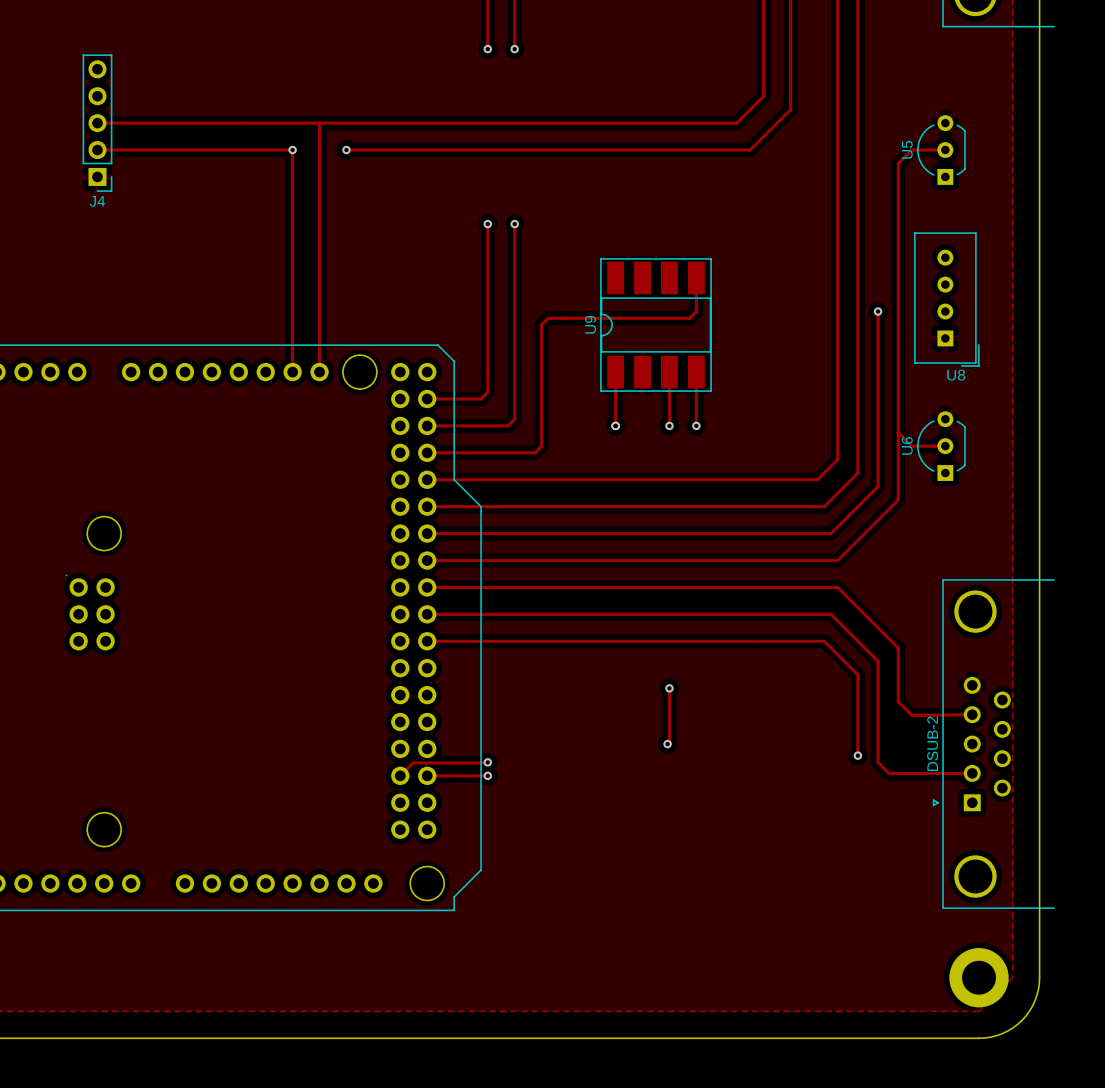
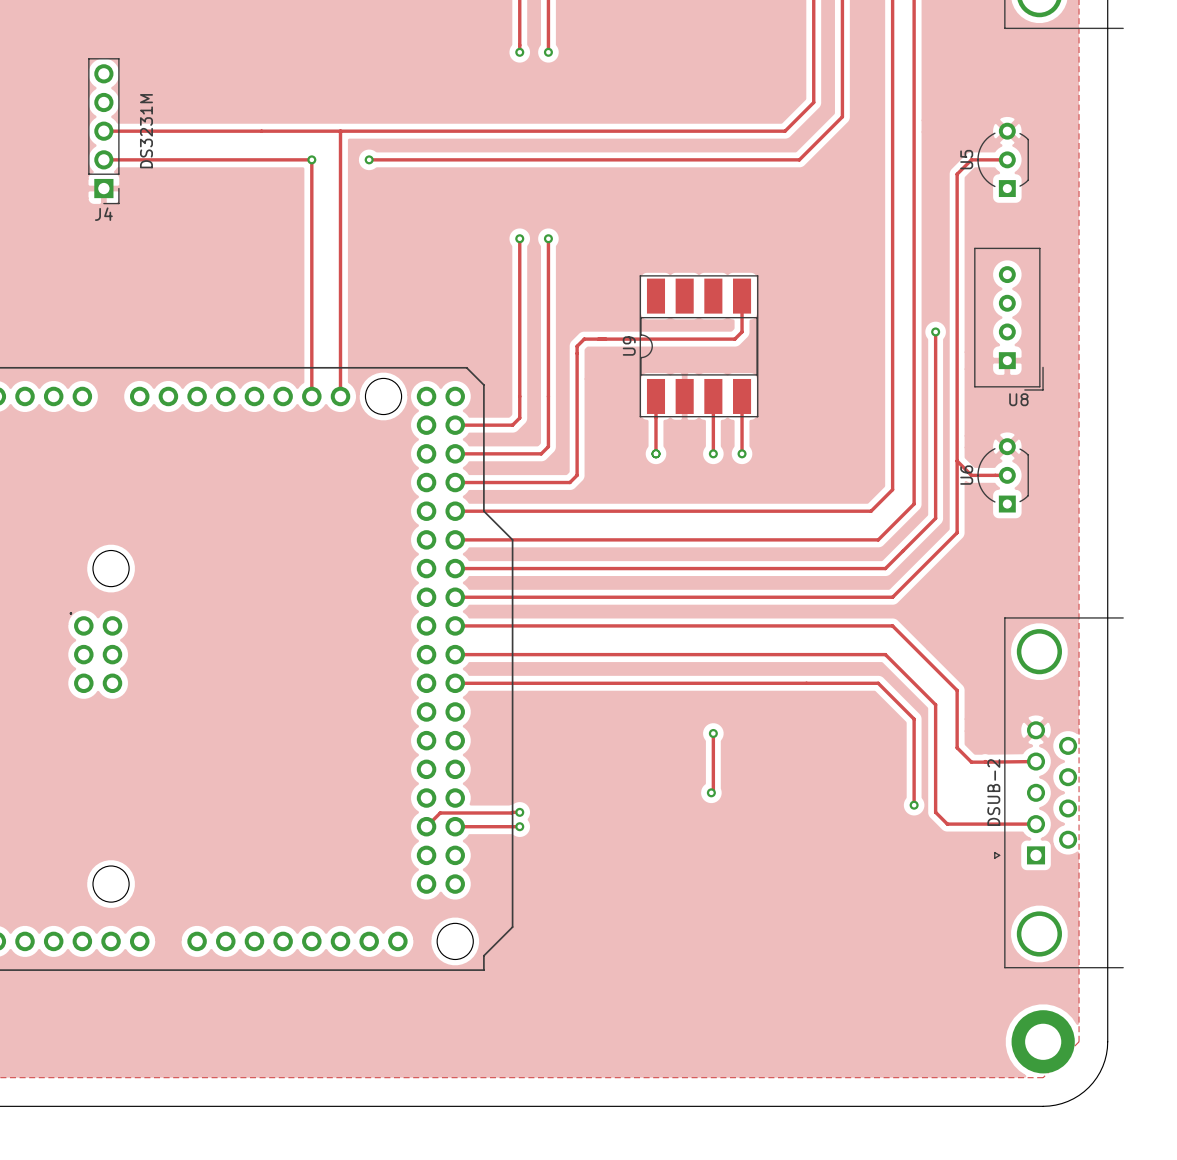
J4 value: none -> DS3231M (146, 131)

